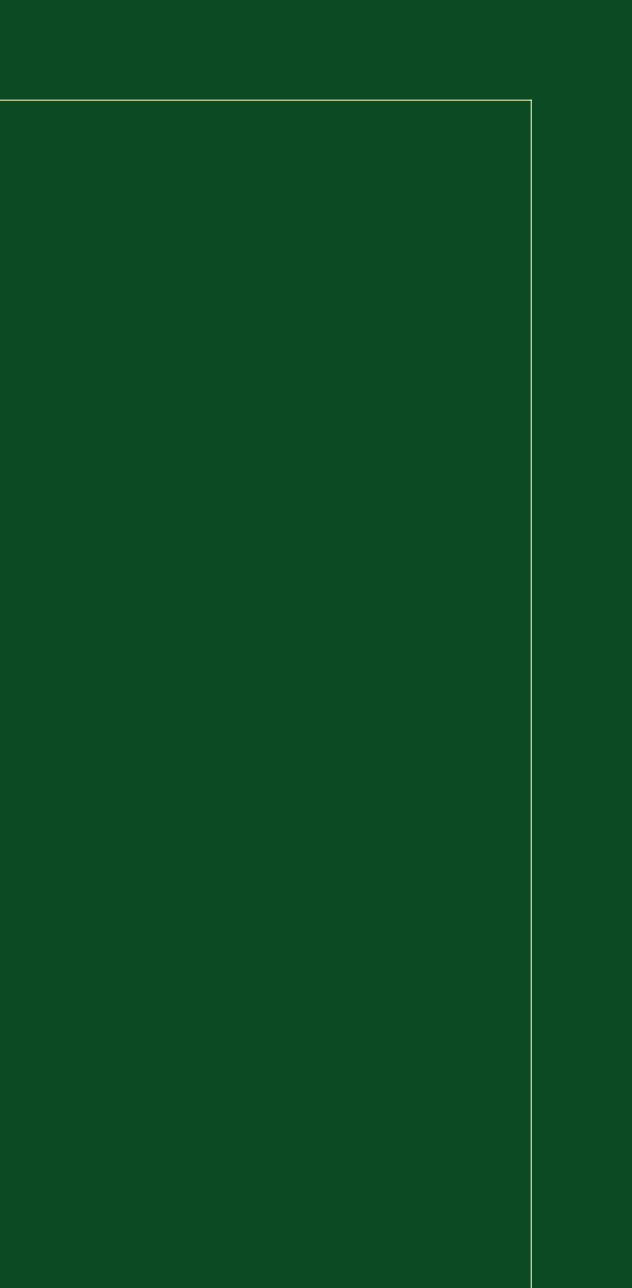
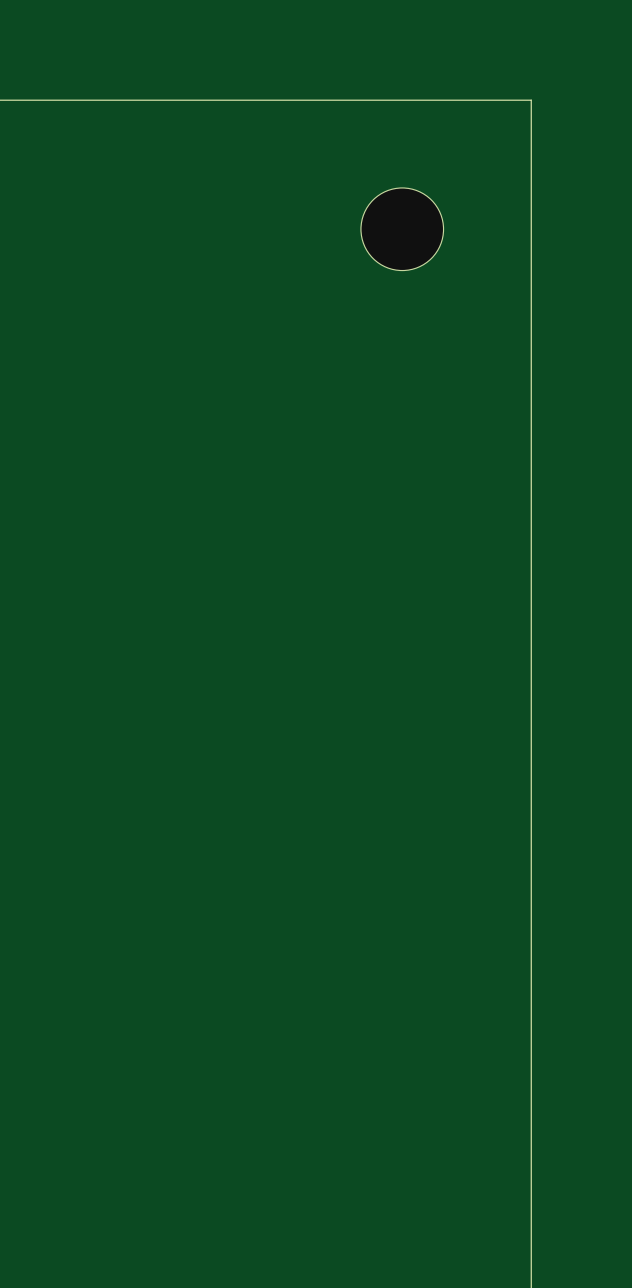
part: none -> (402, 229)

